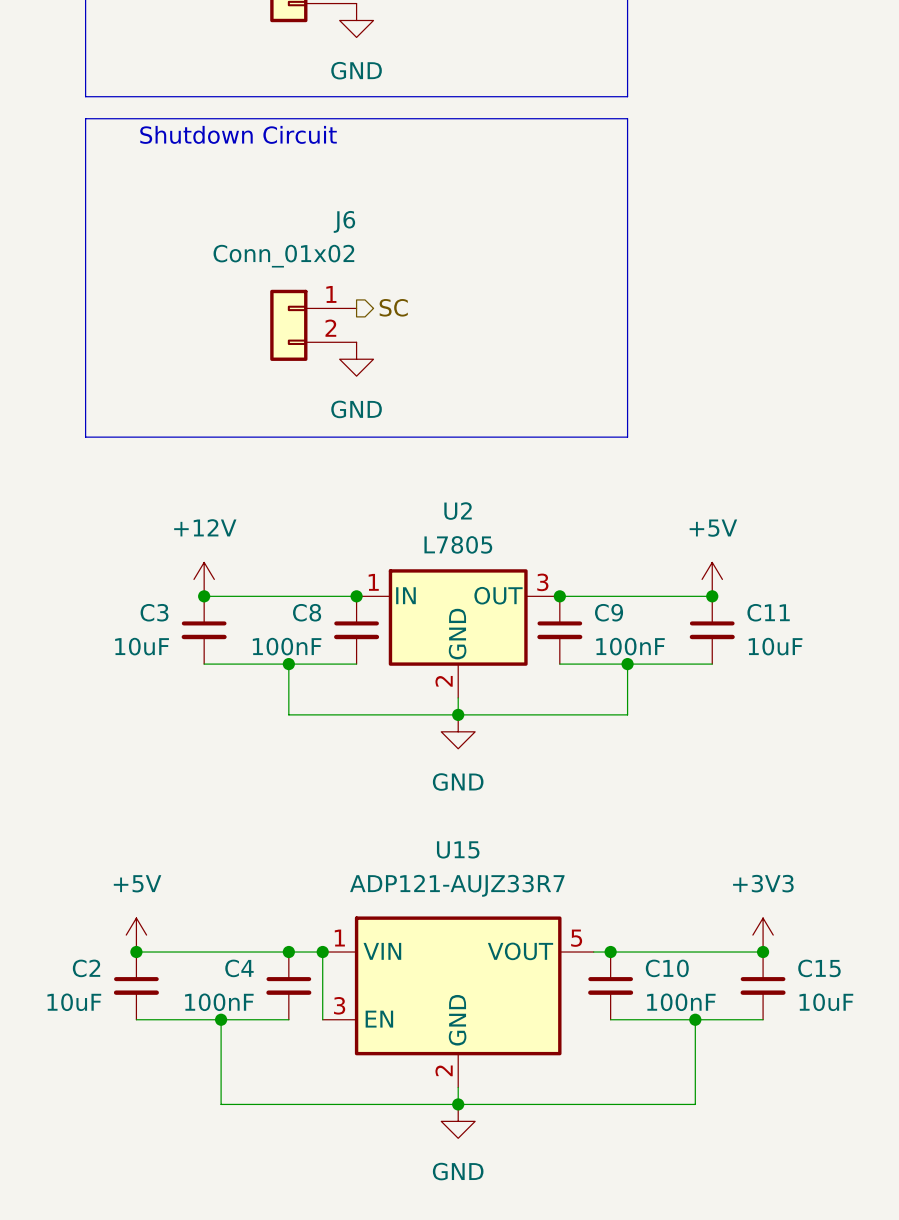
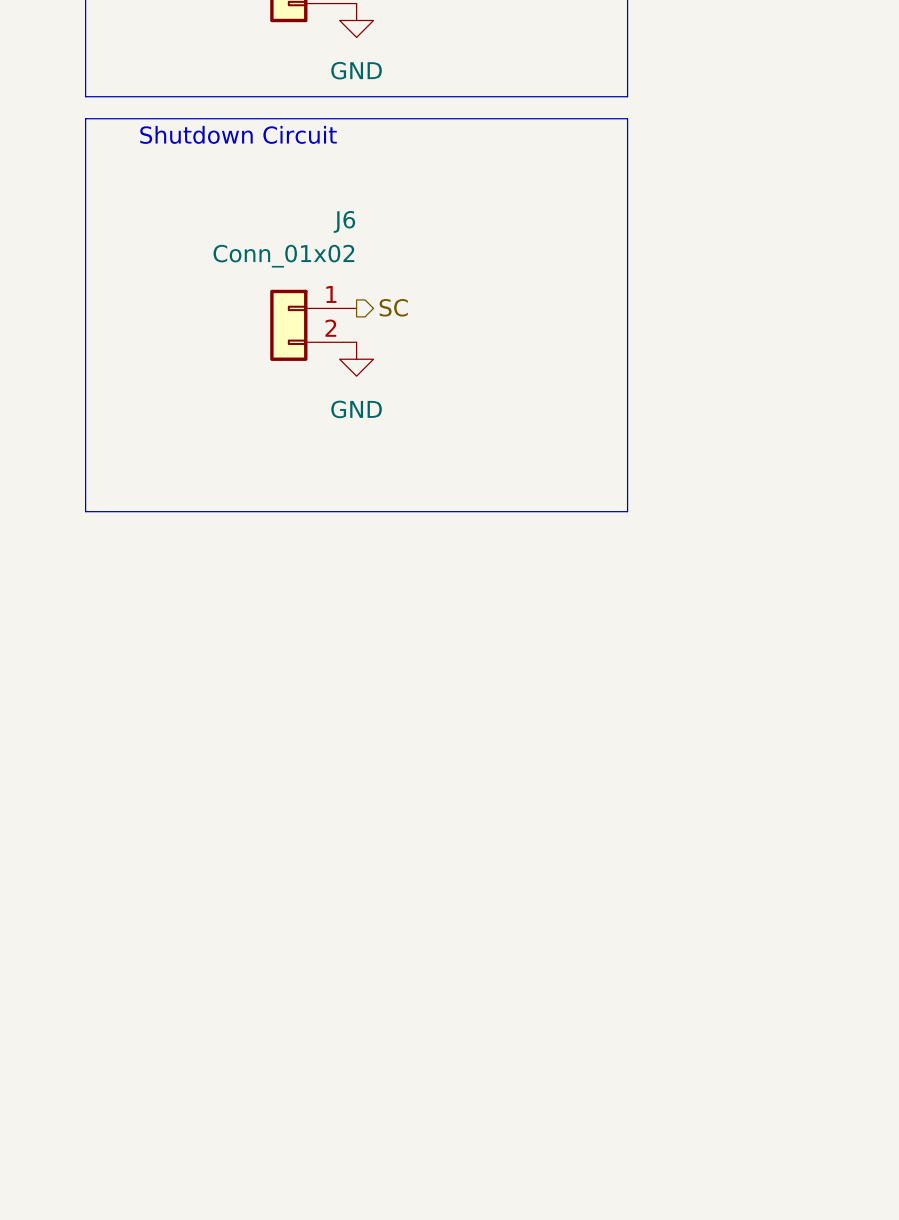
line: (85, 437) (627, 437) -> (85, 437) (85, 511) (627, 511) (627, 437)
power symbol: +12V (204, 579) -> none
power symbol: +5V (712, 579) -> none
wire: (204, 596) (356, 596) -> none
junction: (204, 596) -> none
junction: (356, 596) -> none
wire: (559, 596) (712, 596) -> none
junction: (559, 596) -> none
junction: (712, 596) -> none
C3: 10uF (204, 630) -> none
C8: 100nF (356, 630) -> none
C9: 100nF (559, 630) -> none
C11: 10uF (712, 630) -> none
U2: L7805 (458, 633) -> none
wire: (204, 664) (356, 664) -> none
wire: (288, 664) (288, 714) (627, 714) (627, 664) -> none
junction: (288, 664) -> none
wire: (559, 664) (712, 664) -> none
junction: (627, 664) -> none
wire: (458, 697) (458, 714) -> none
junction: (458, 714) -> none
power symbol: GND (458, 731) -> none
power symbol: +5V (136, 935) -> none
power symbol: +3V3 (763, 935) -> none
wire: (136, 952) (322, 952) (322, 1019) -> none
junction: (136, 952) -> none
junction: (288, 952) -> none
junction: (322, 952) -> none
wire: (593, 952) (763, 952) -> none
junction: (610, 952) -> none
junction: (763, 952) -> none
C2: 10uF (136, 985) -> none
C4: 100nF (288, 985) -> none
C10: 100nF (610, 985) -> none
C15: 10uF (763, 985) -> none
U15: ADP121-AUJZ33R7 (458, 1001) -> none
wire: (136, 1019) (288, 1019) -> none
wire: (221, 1019) (221, 1104) (695, 1104) (695, 1019) -> none
junction: (221, 1019) -> none
wire: (610, 1019) (763, 1019) -> none
junction: (695, 1019) -> none
wire: (458, 1087) (458, 1104) -> none
junction: (458, 1104) -> none
power symbol: GND (458, 1121) -> none

